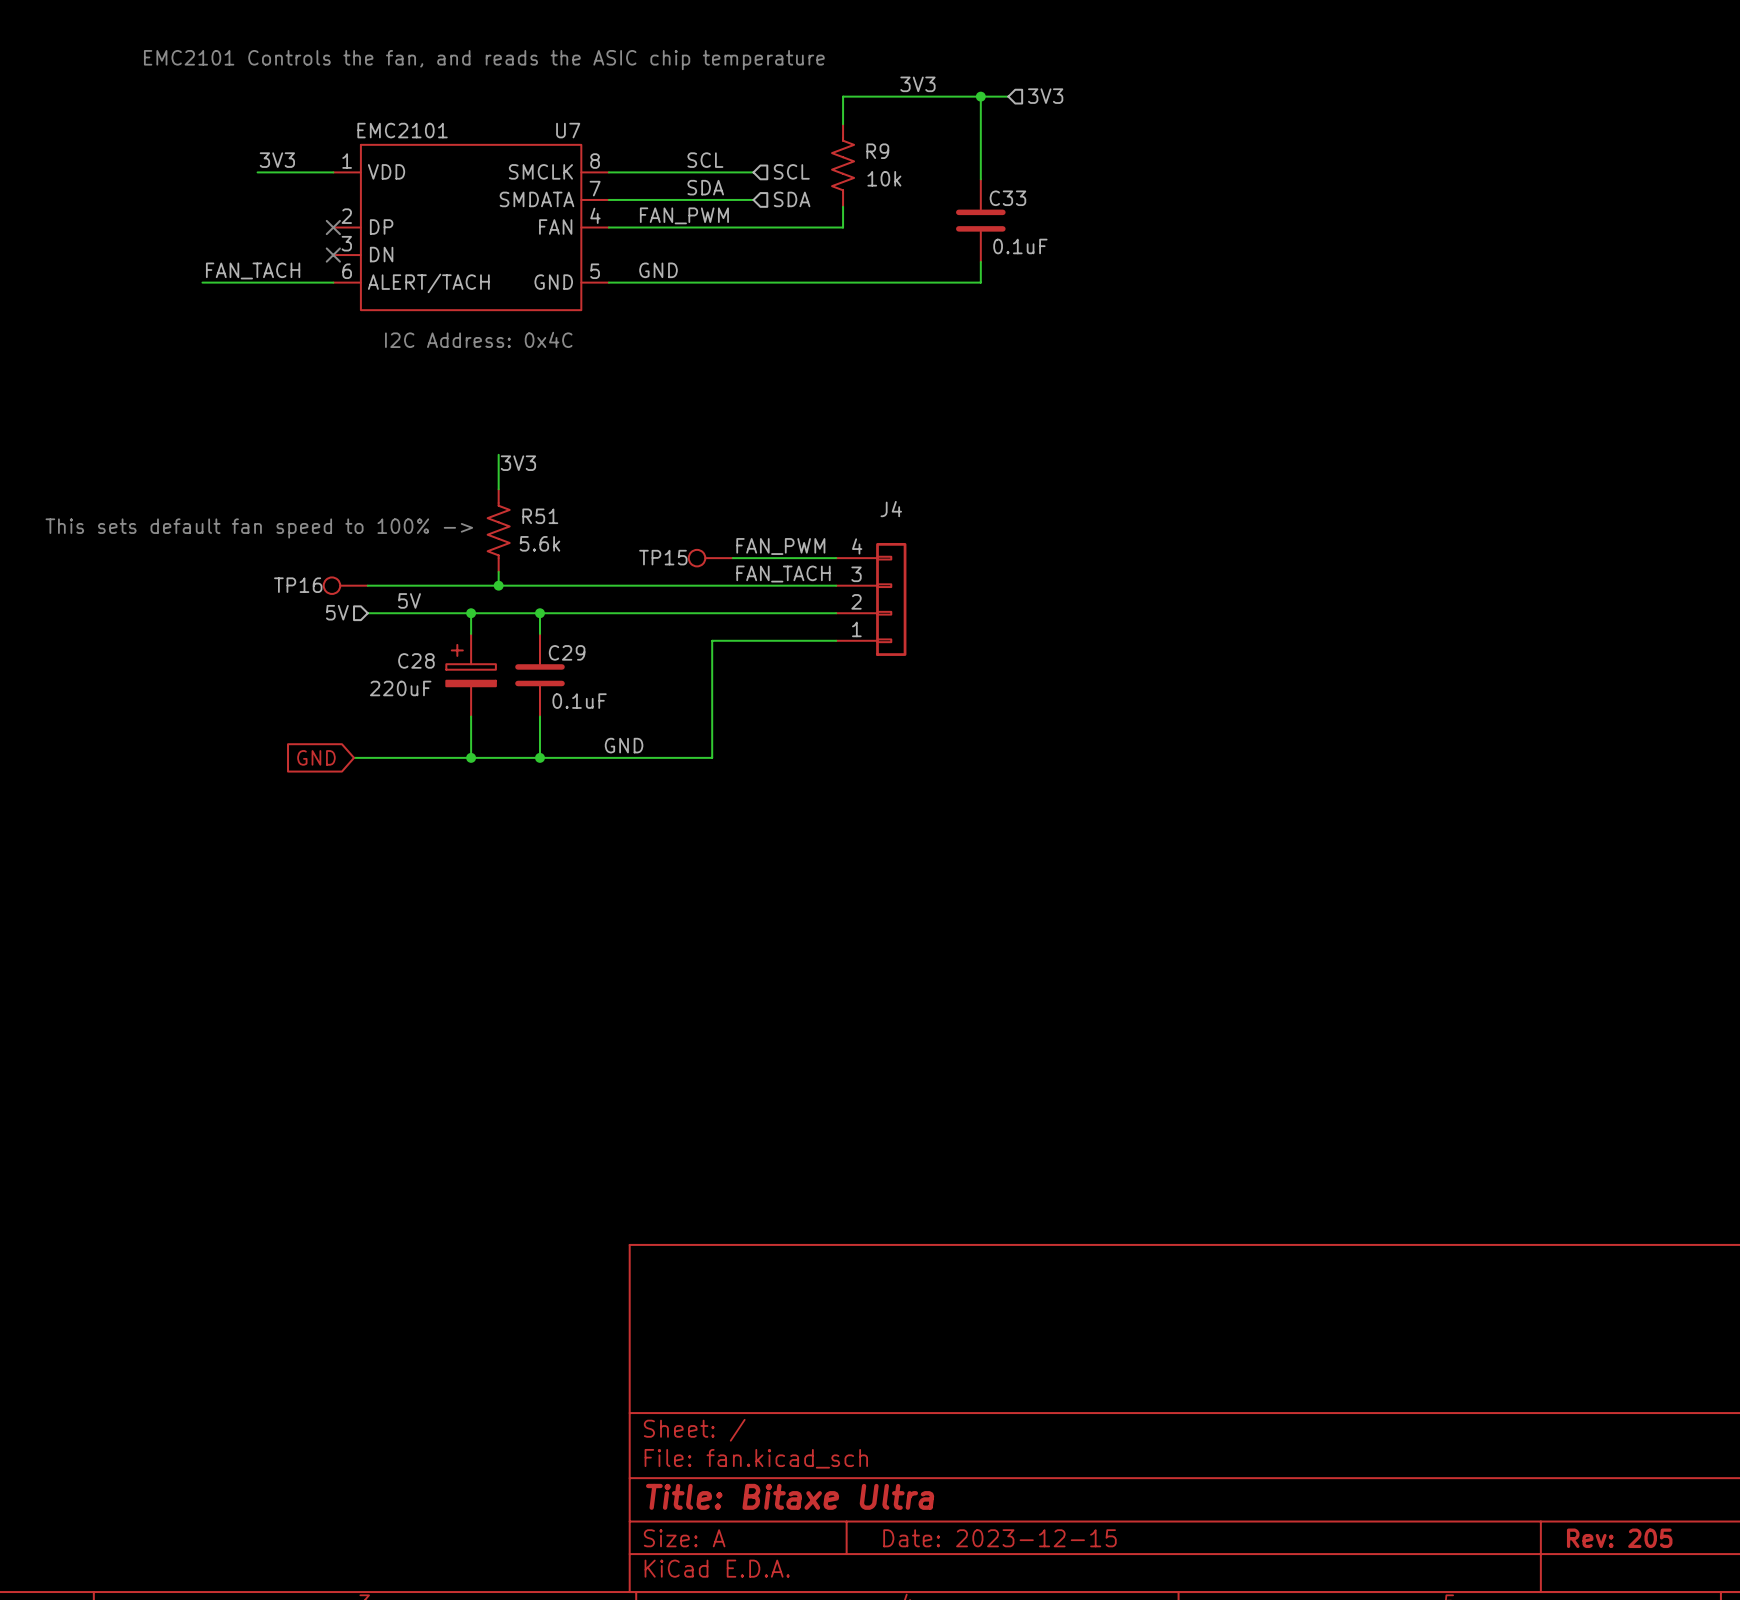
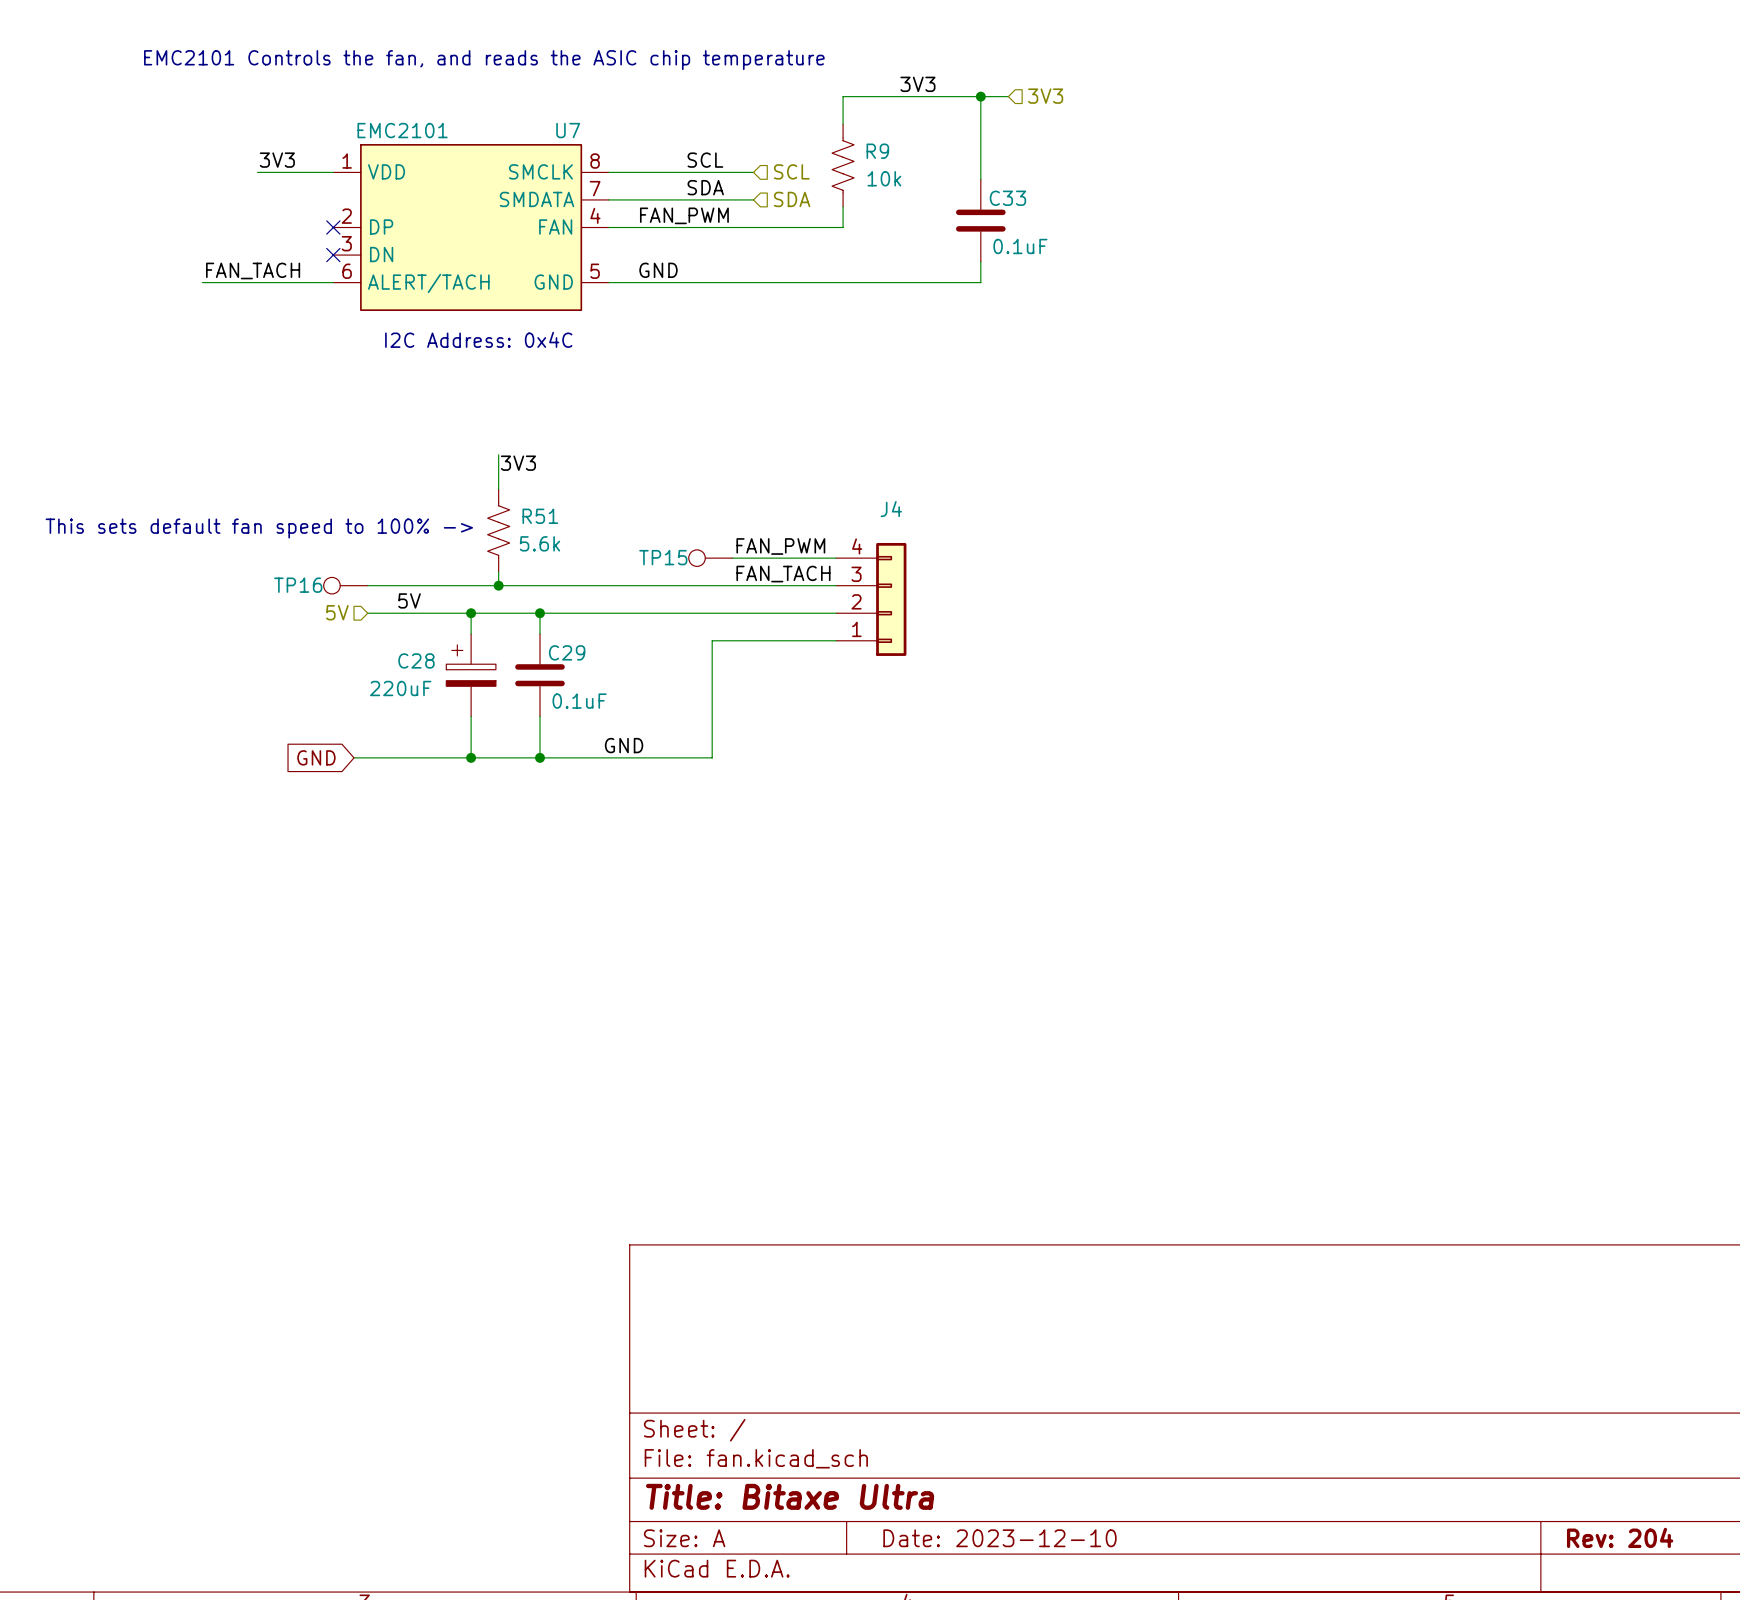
title block: Date: 2023-12-15 (999, 1538) -> Date: 2023-12-10 (999, 1538)
title block: Rev: 205 (1619, 1538) -> Rev: 204 (1620, 1537)

